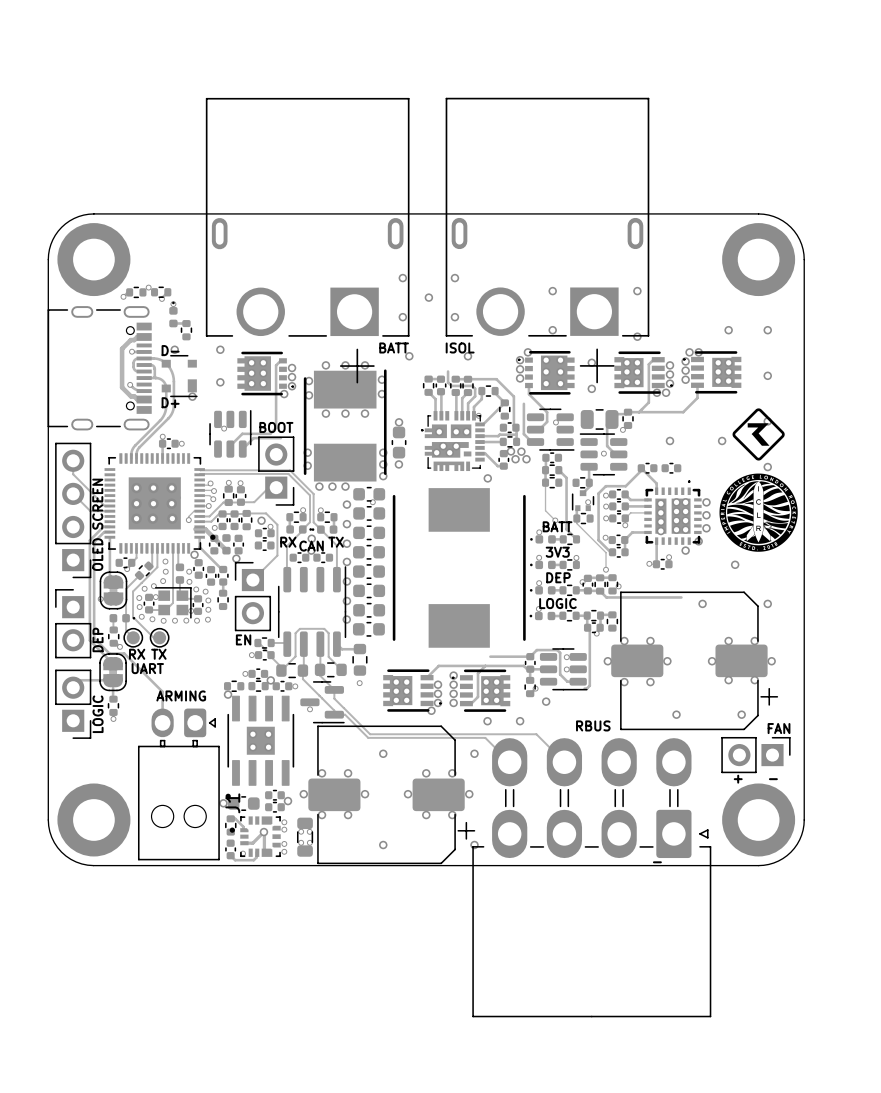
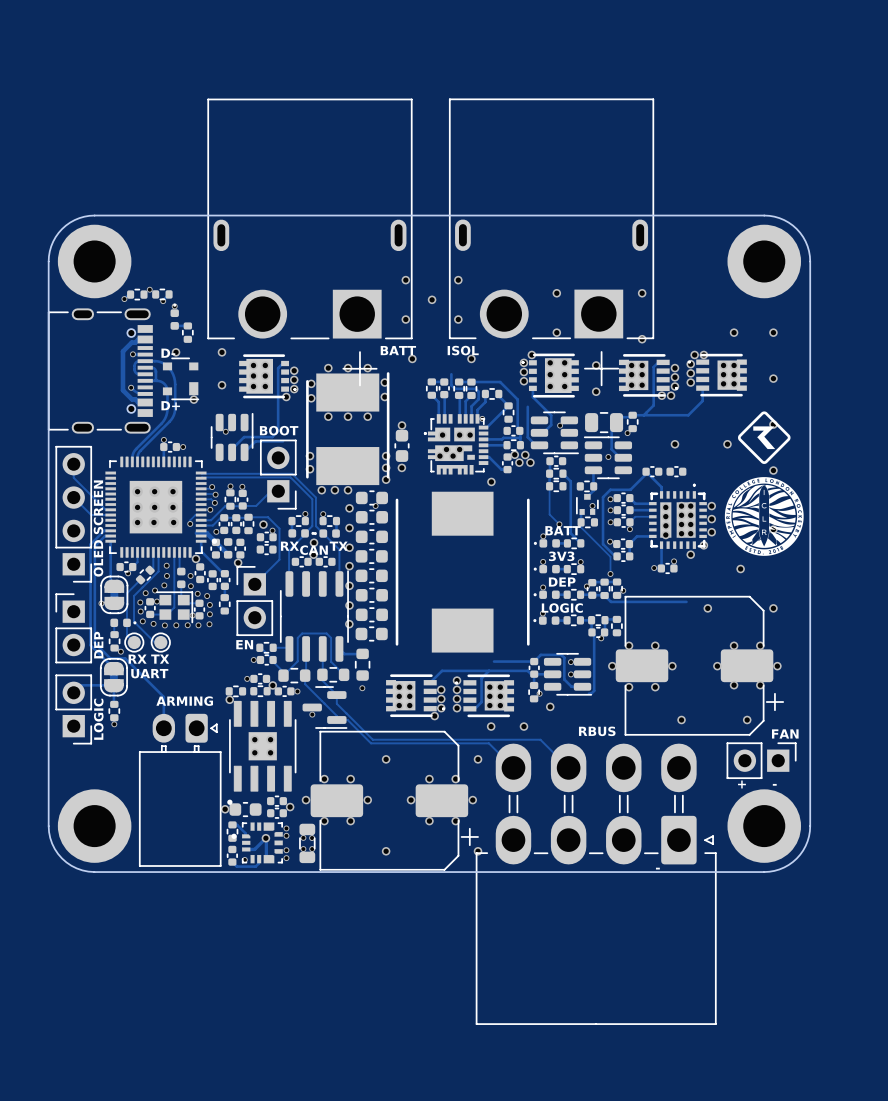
J1: (178, 784) -> none

